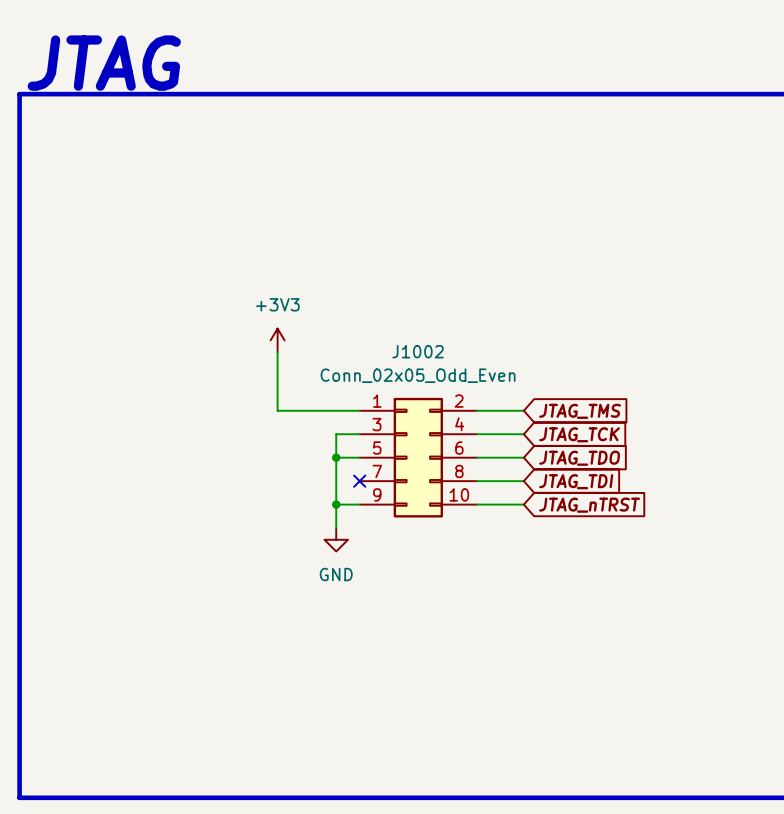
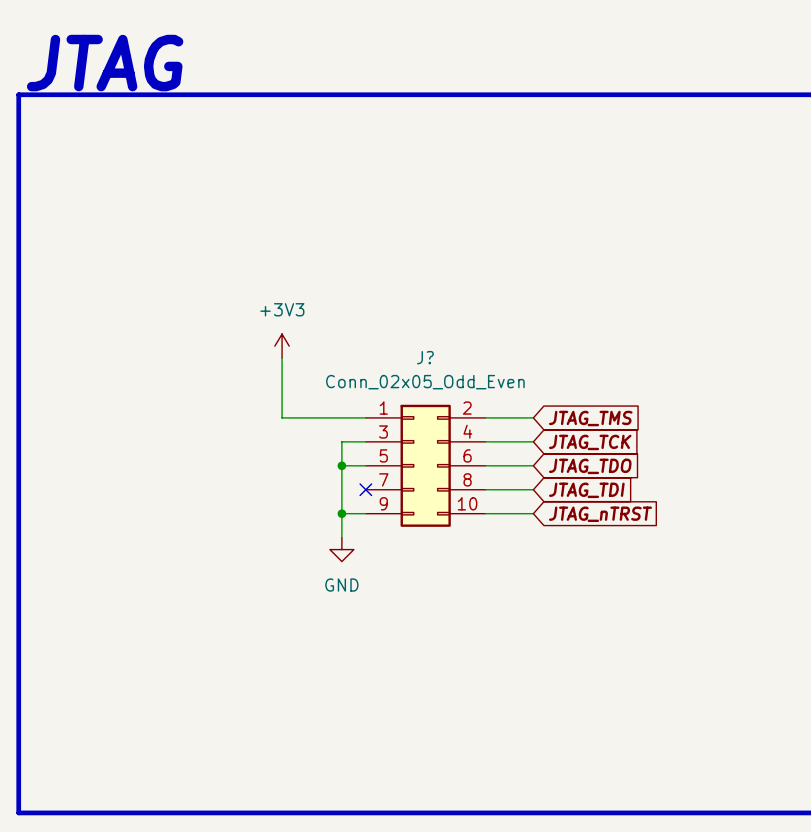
J1002 name: J1002 (418, 351) -> J? (425, 357)

